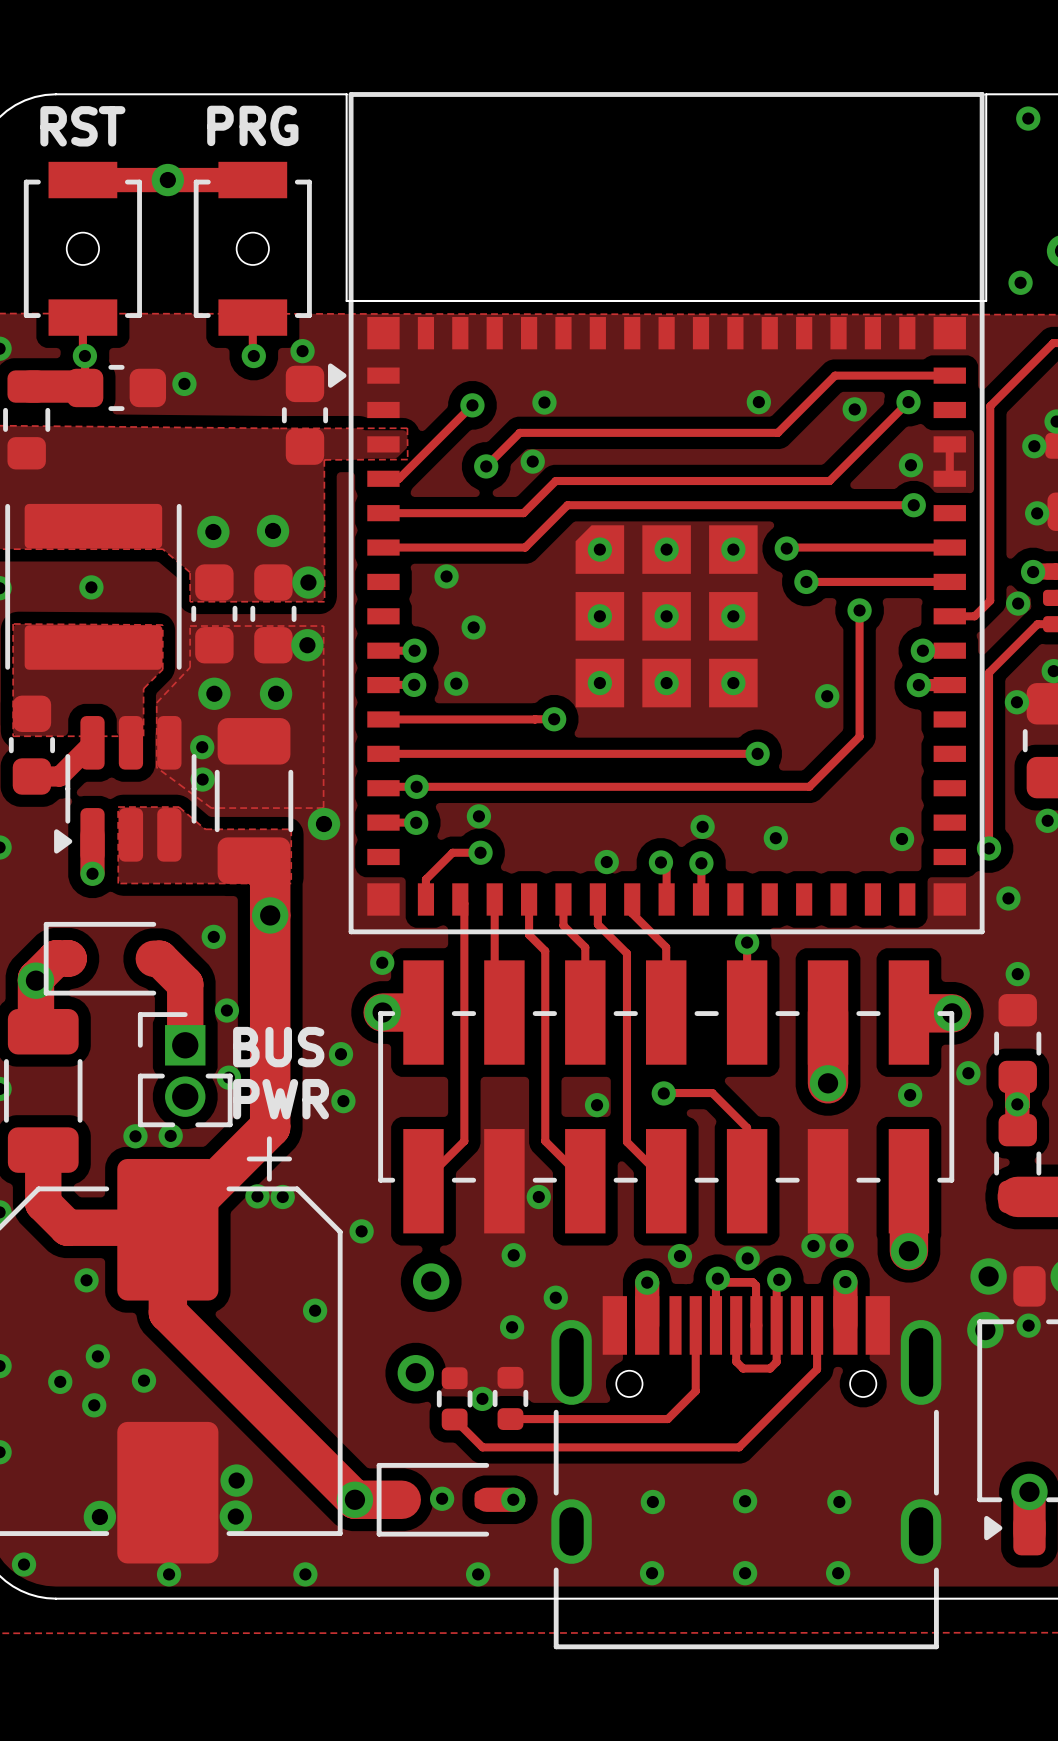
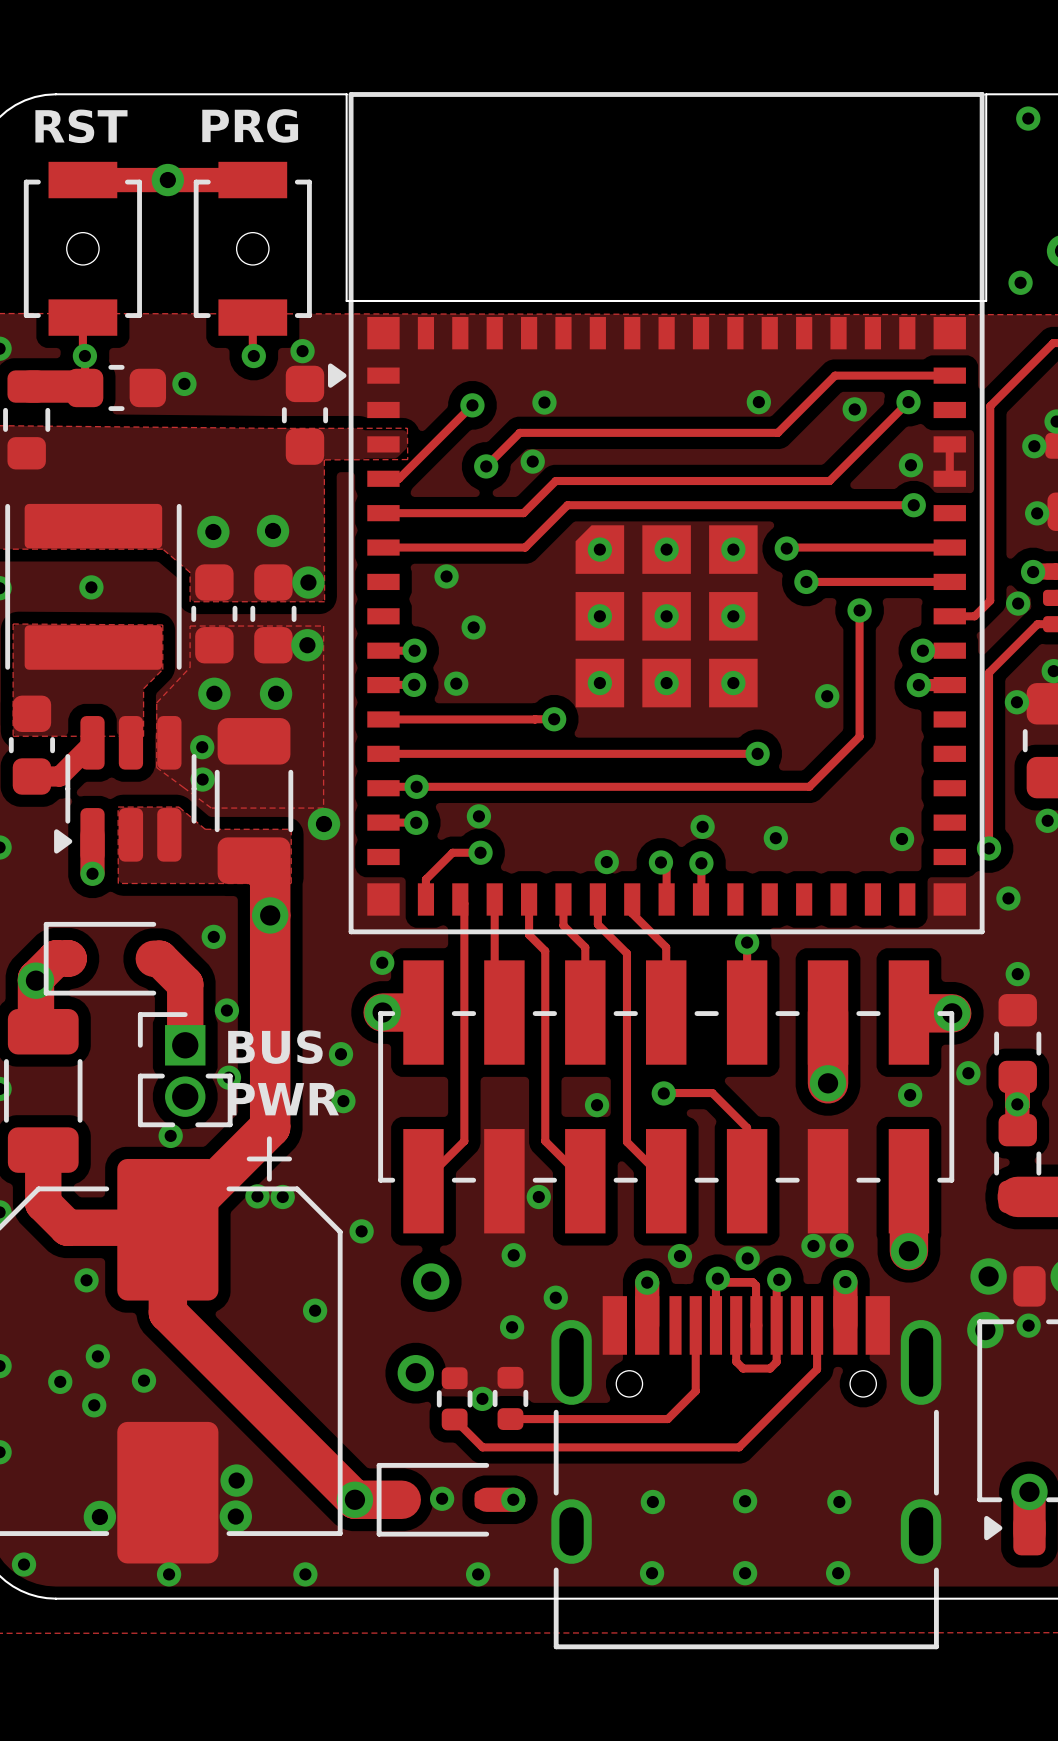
via: (135, 1136) -> none

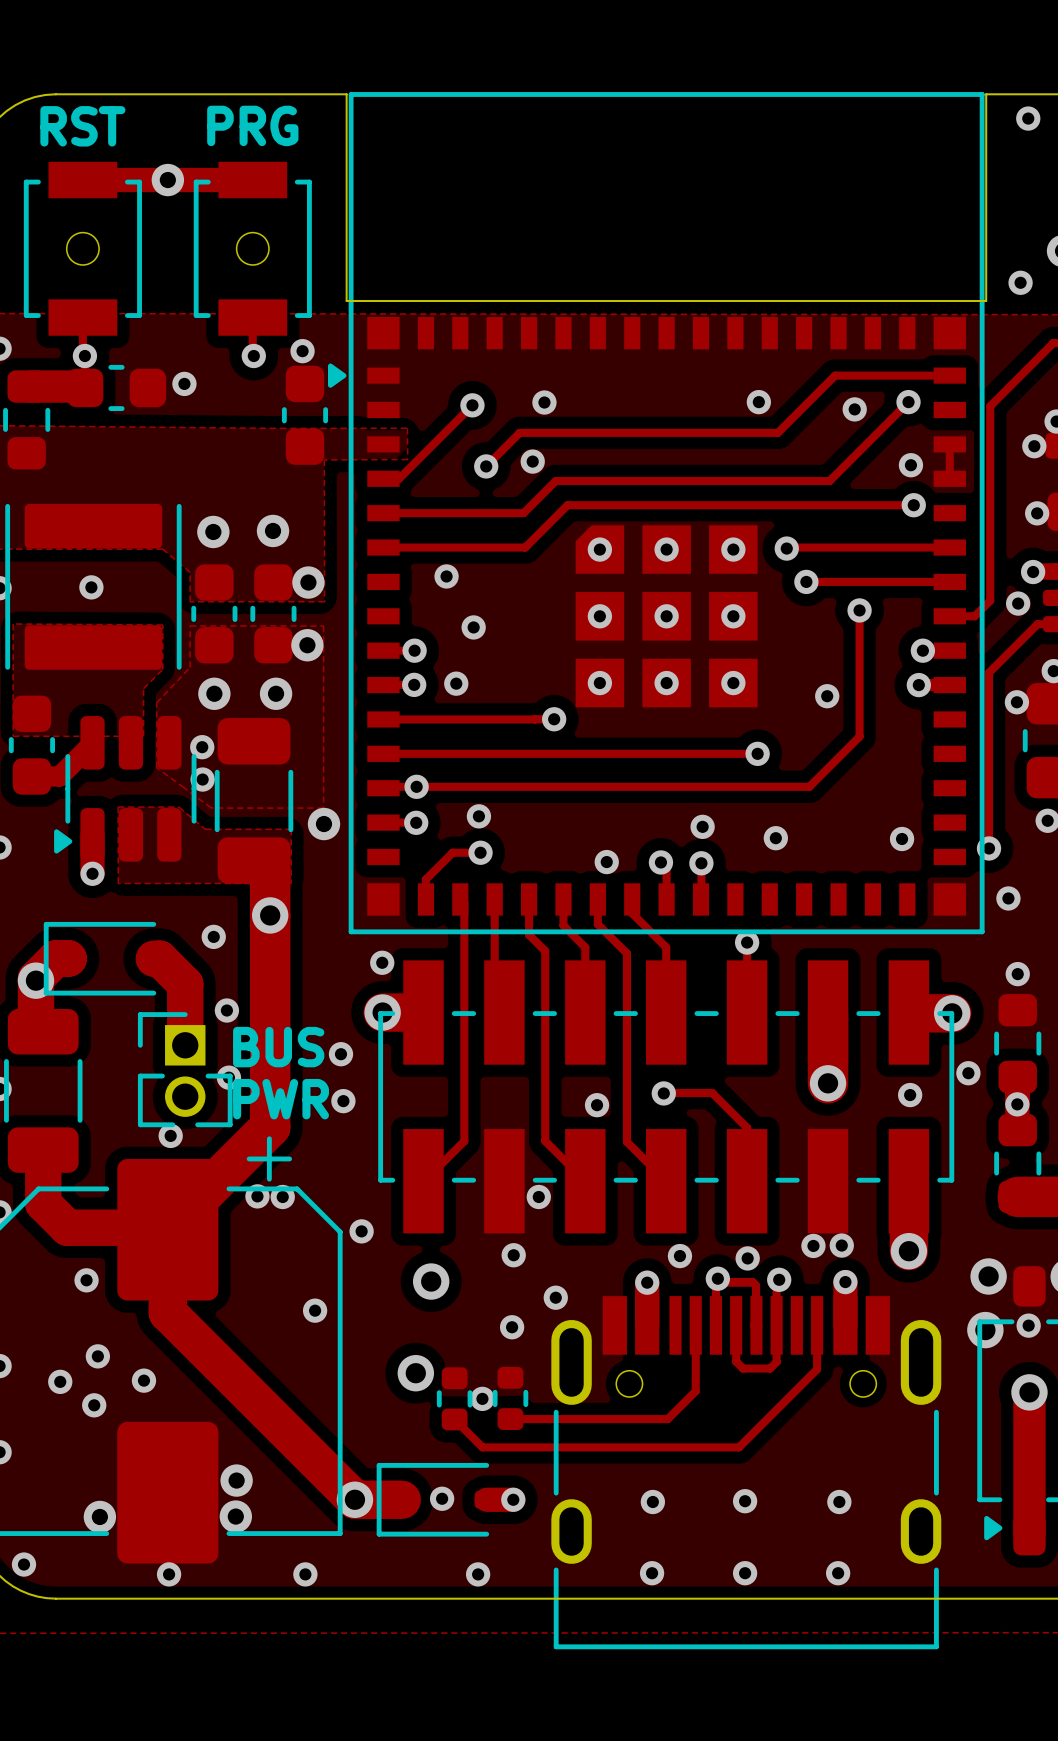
track: none -> (1029, 1392) (1029, 1491)
via position: (1029, 1491) -> (1029, 1392)

